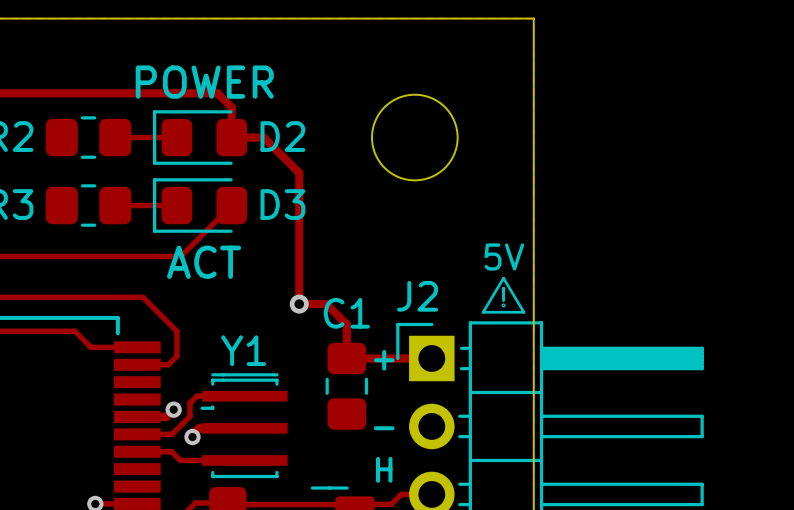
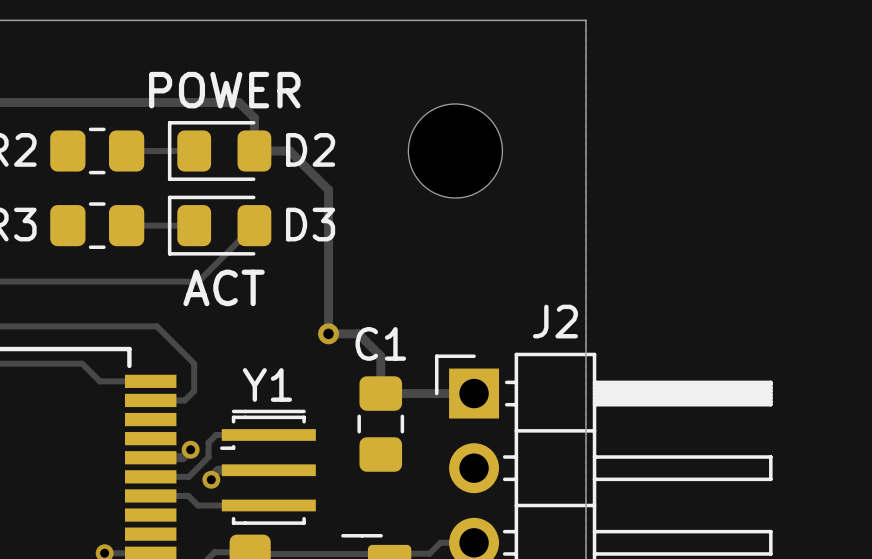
text: 5V (504, 256) -> none
line: (503, 278) (483, 312) (523, 312) (503, 278) -> none
line: (502, 288) (504, 288) (503, 300) (502, 288) -> none
J2 name position: J2 (417, 296) -> J2 (555, 321)
drawing: [501, 303, 506, 308] -> none
text: + (384, 360) -> none
text: - (384, 428) -> none
text: H (384, 469) -> none

